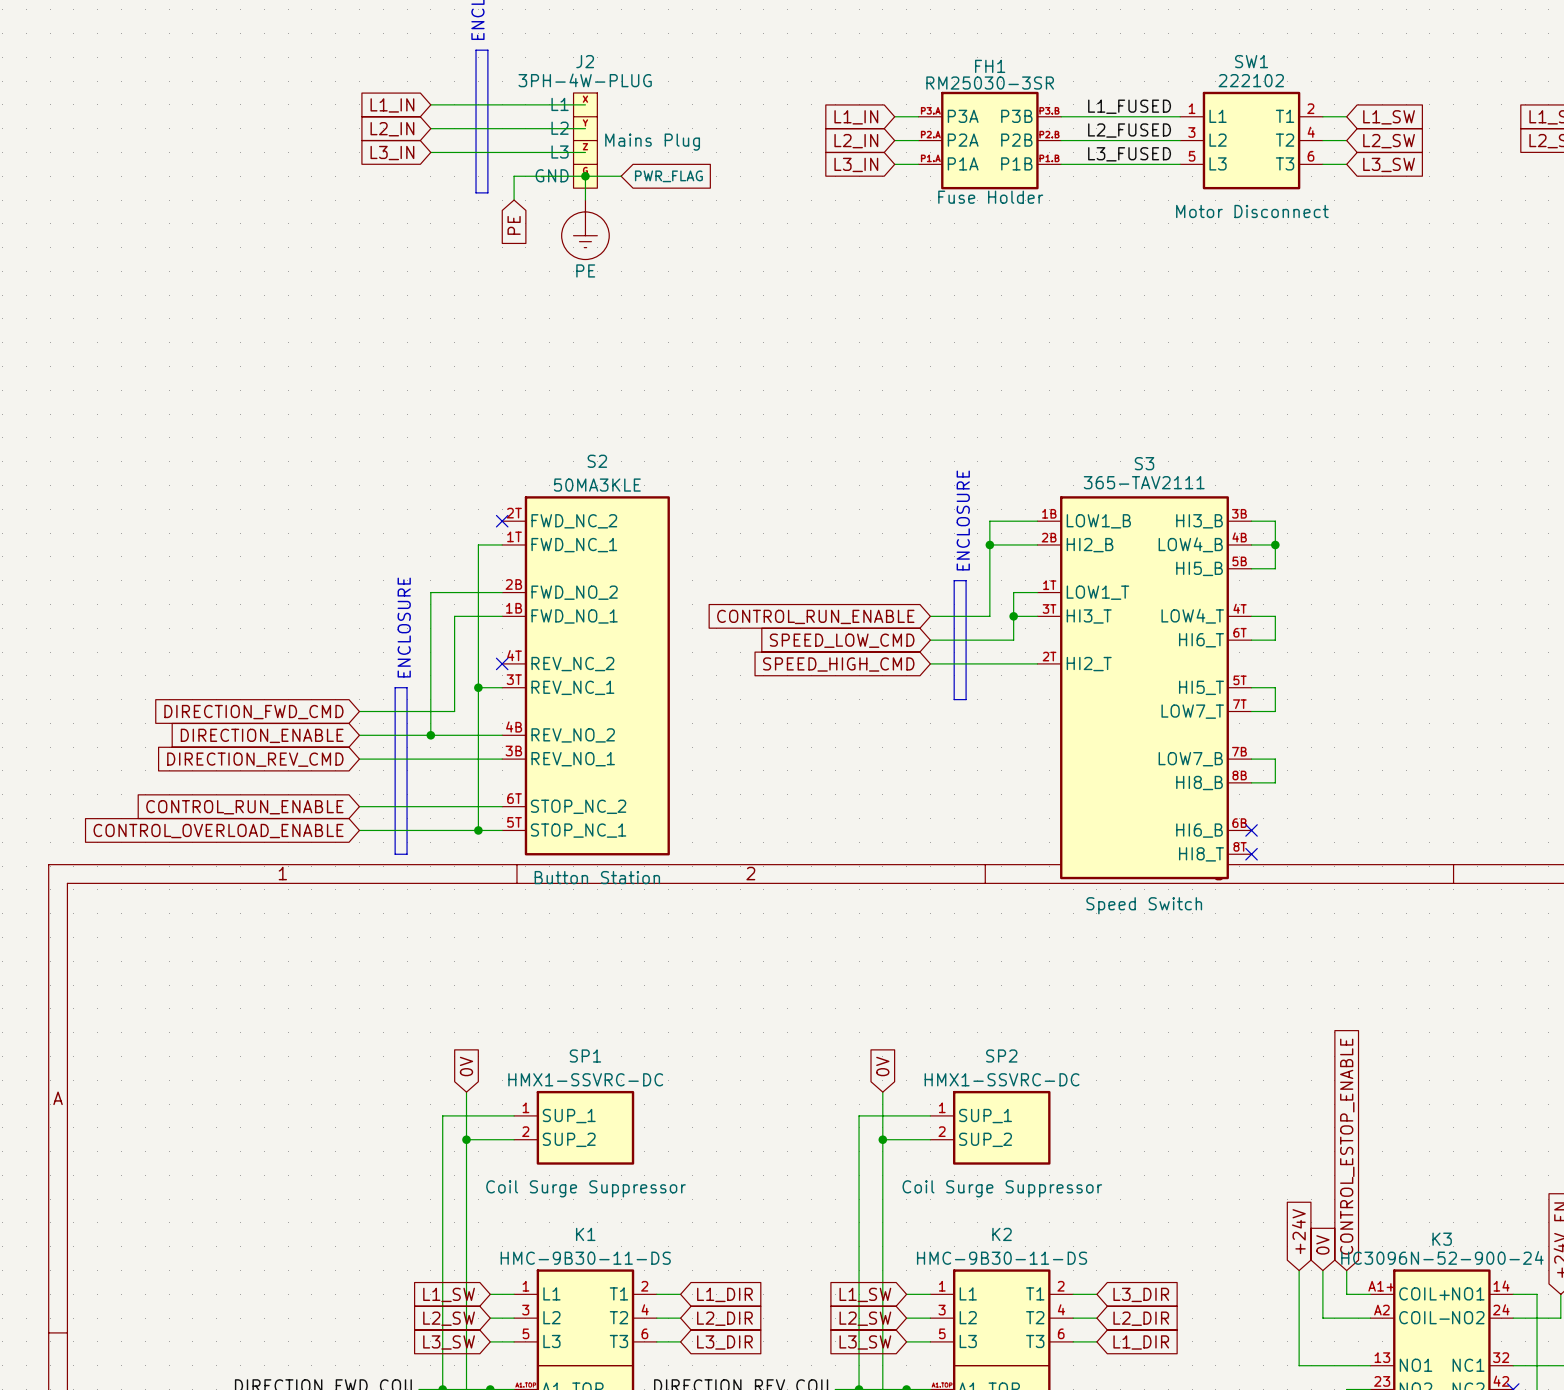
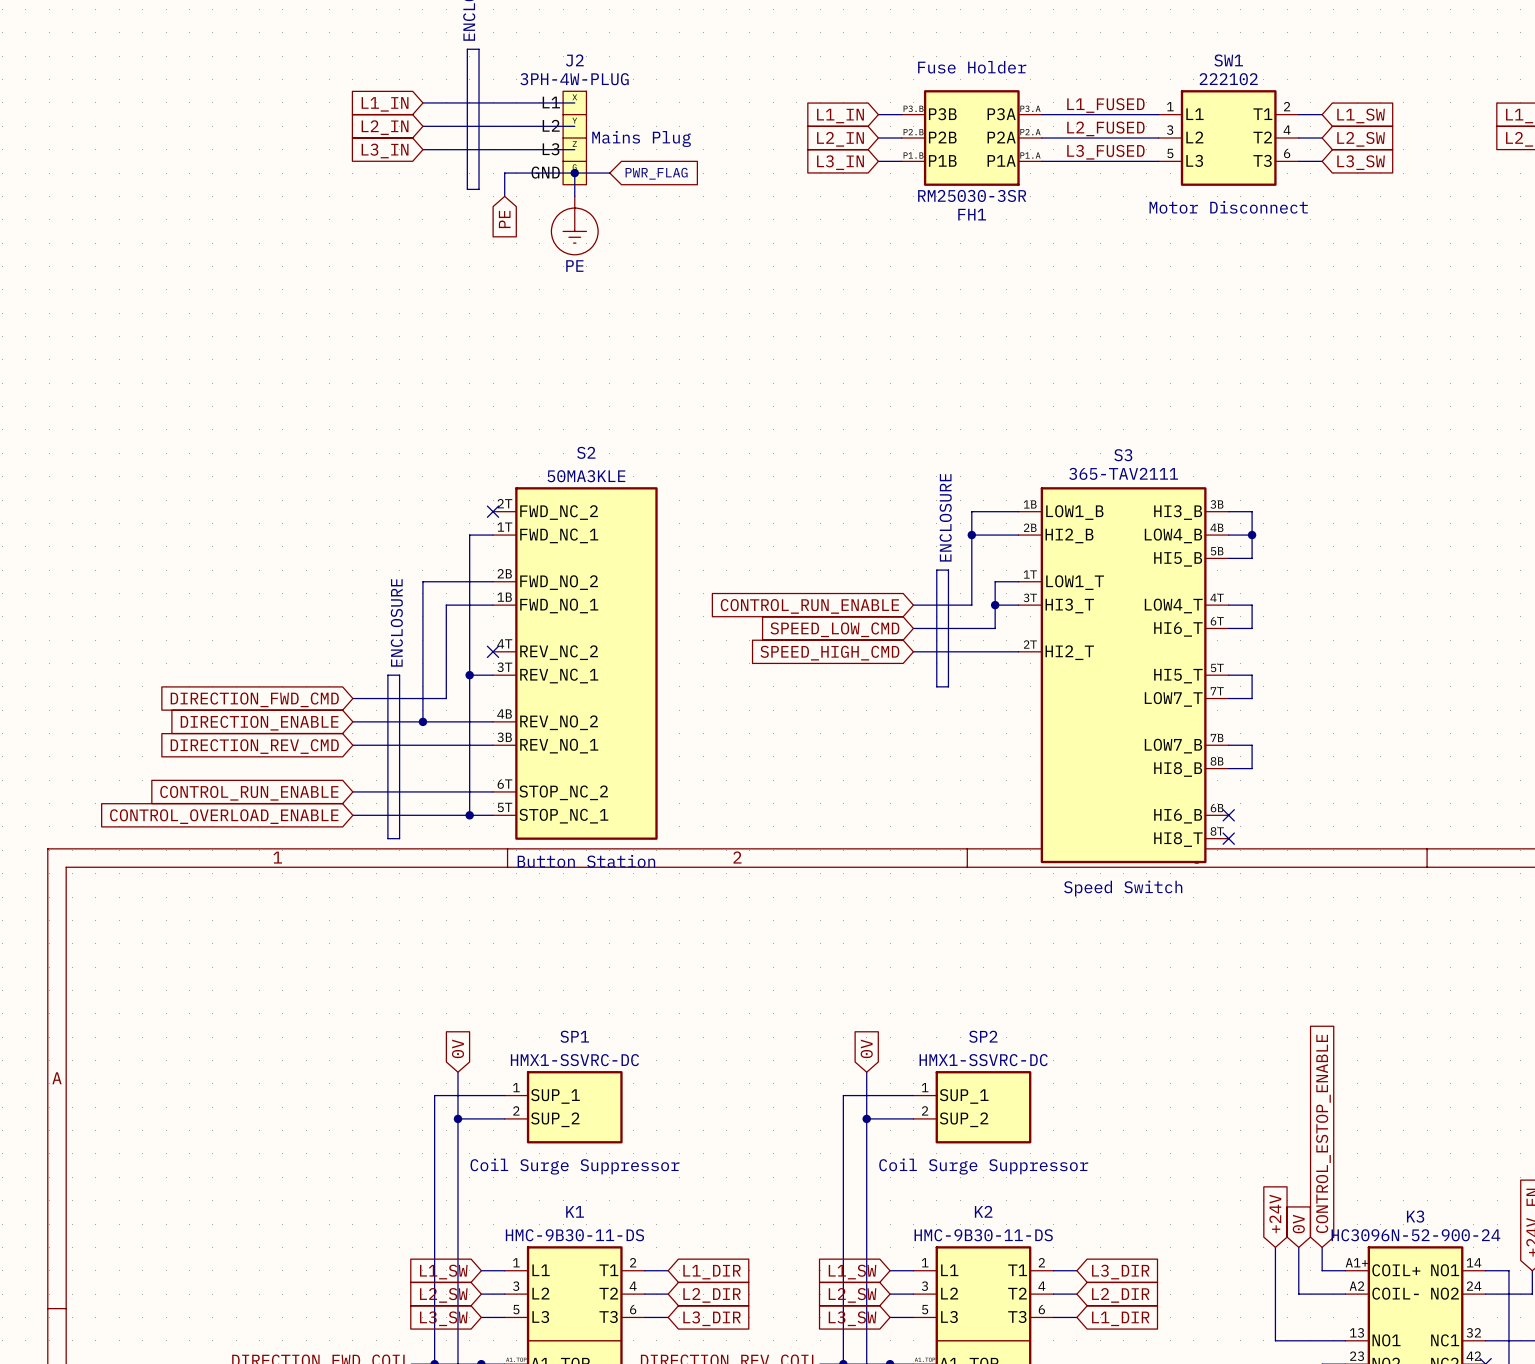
FH1 name position: FH1 (990, 66) -> FH1 (972, 214)
FH1 value position: RM25030-3SR (990, 83) -> RM25030-3SR (972, 195)
FH1 flip: as is (989, 140) -> left-right (971, 138)
FH1 text position: Fuse Holder (990, 197) -> Fuse Holder (972, 67)

